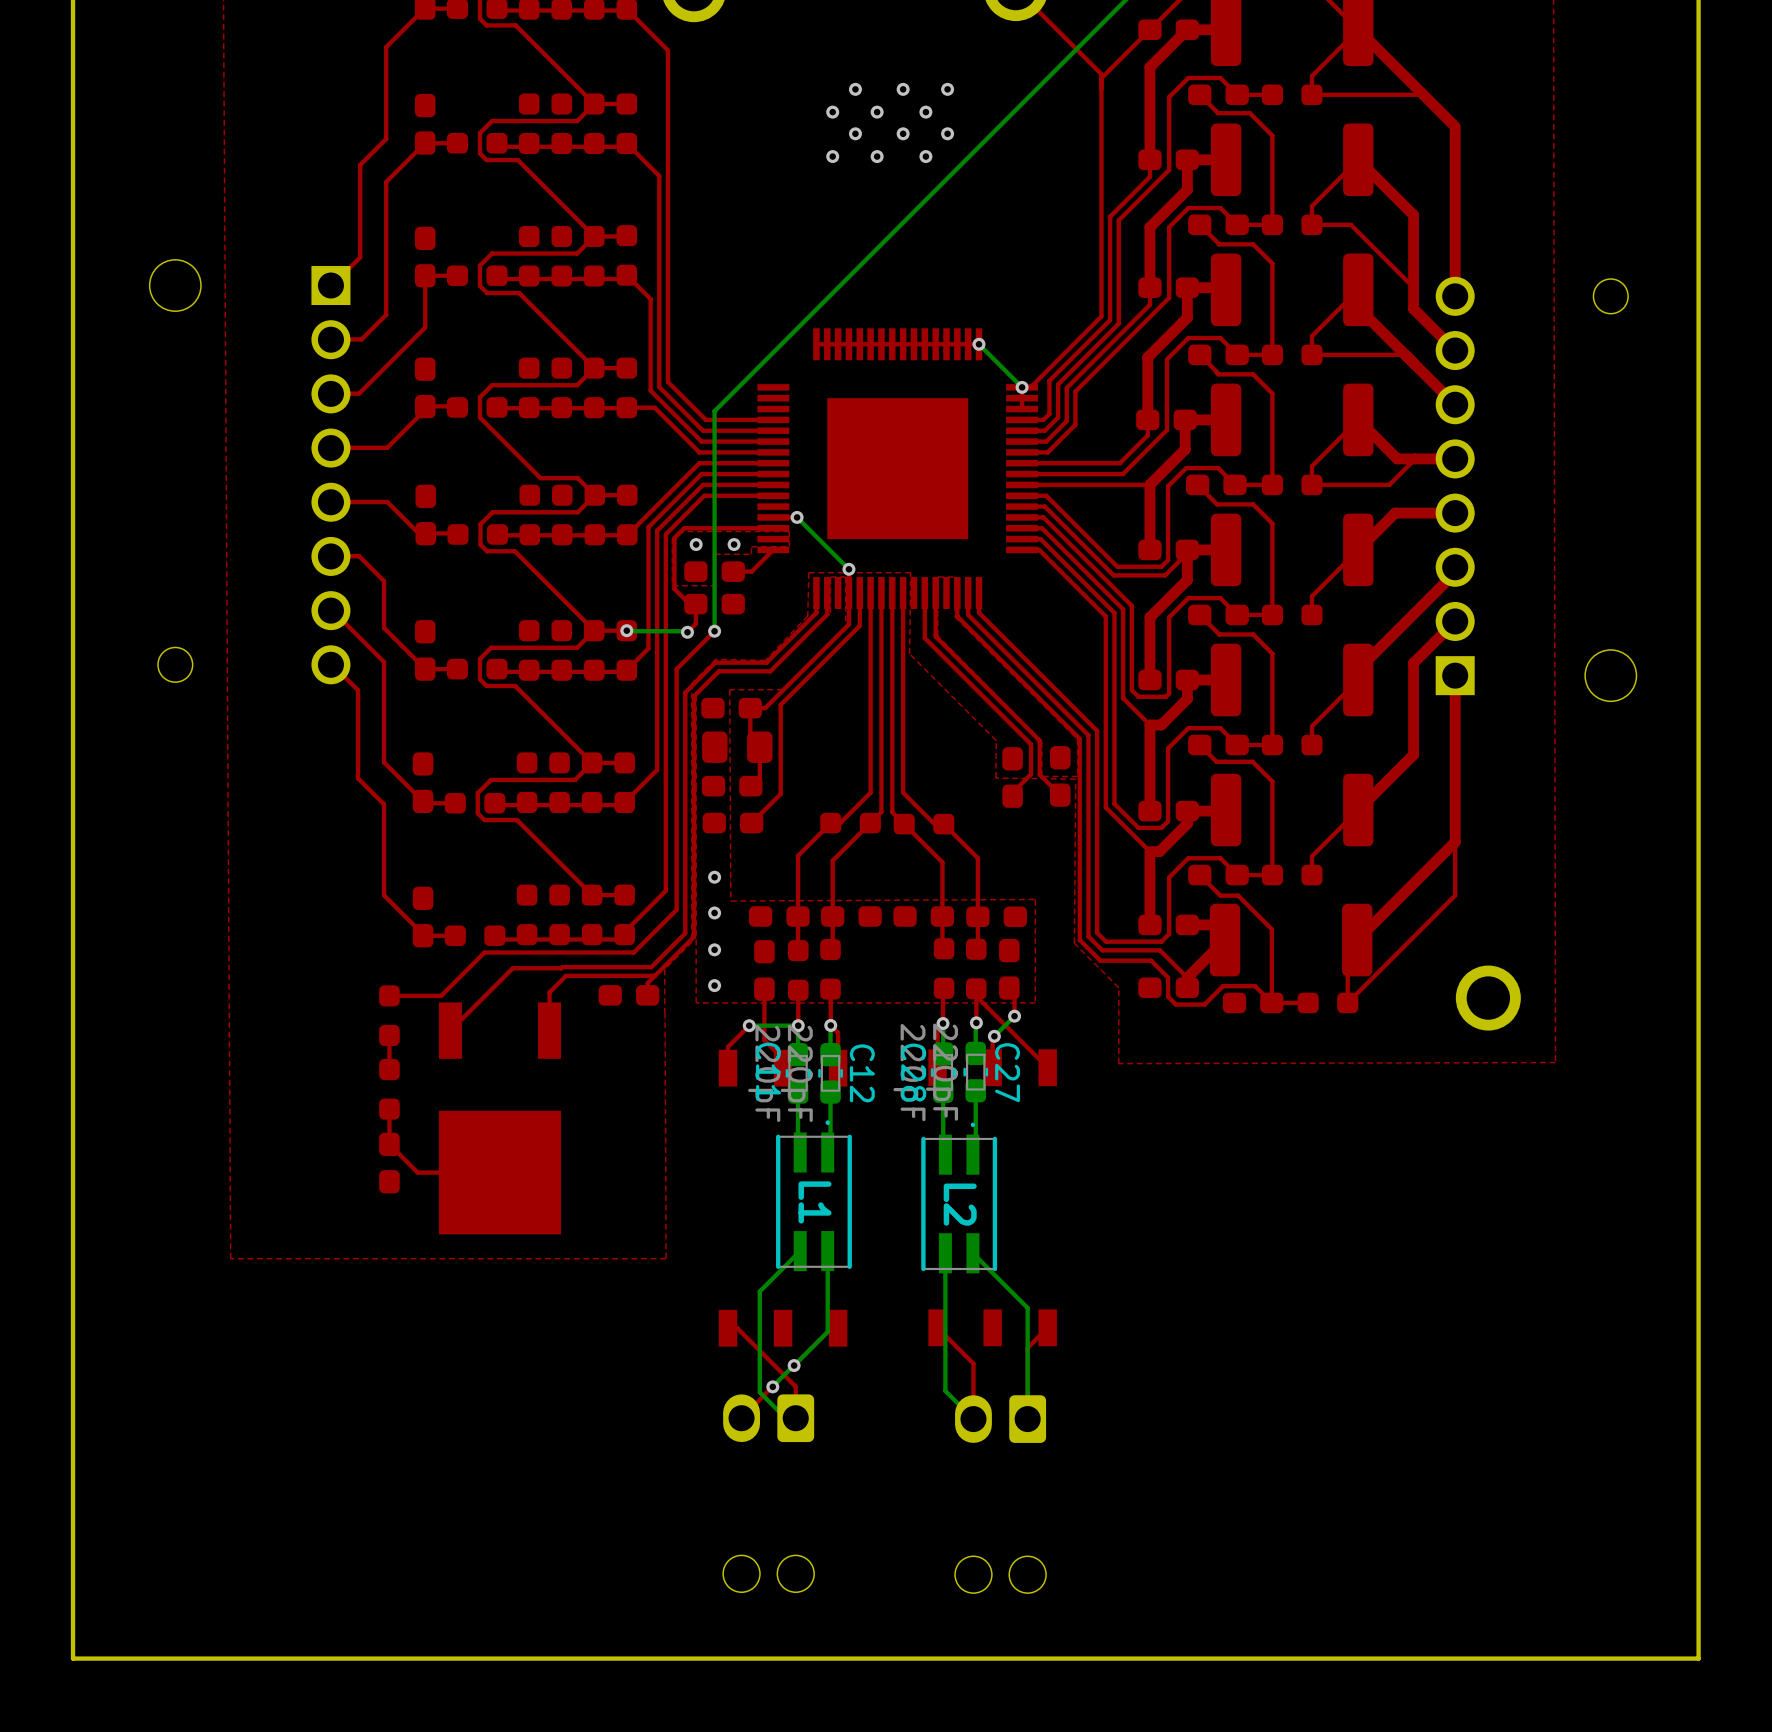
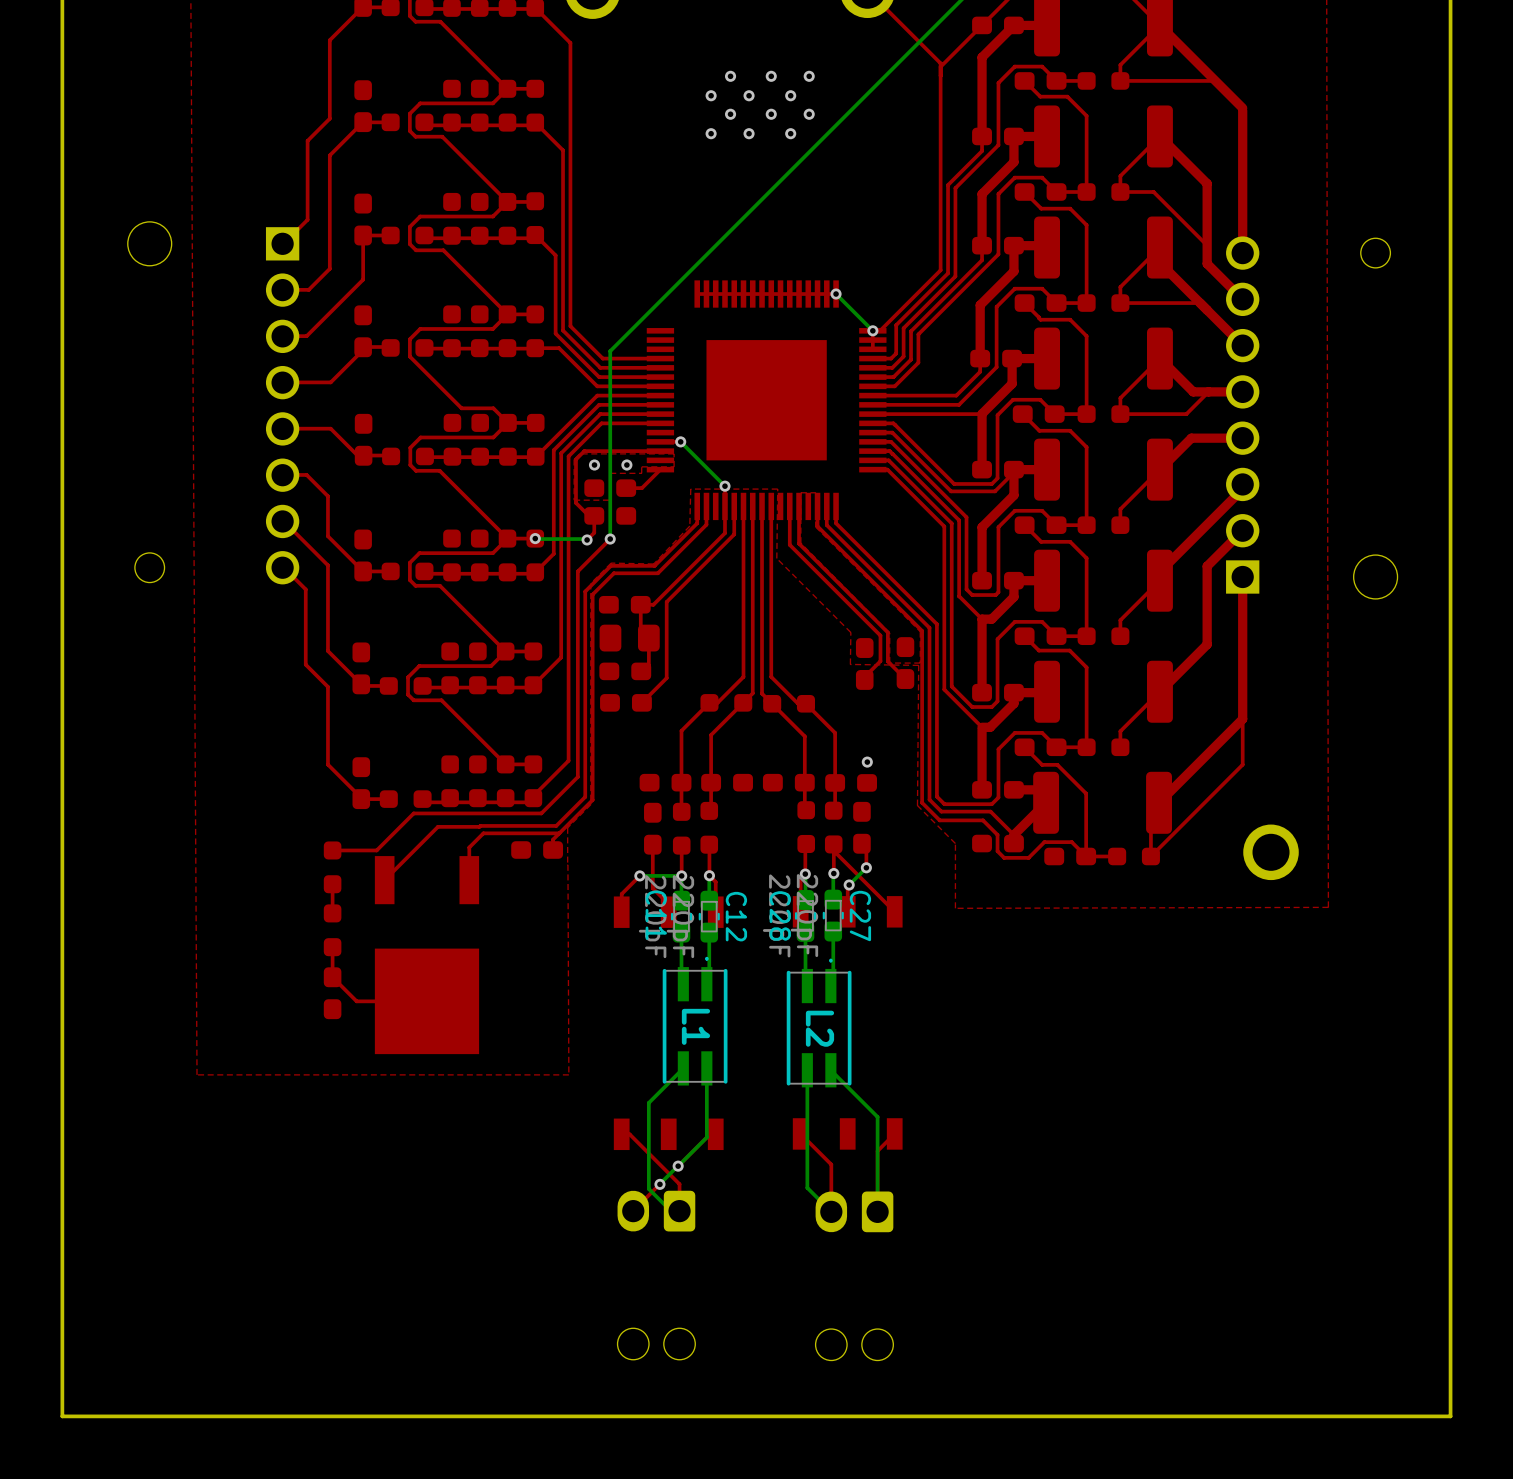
top zone outline: (845, 577) (845, 626) (782, 689) (729, 689) (730, 901) (1035, 899) (1035, 1002) (696, 1002) (696, 695) (718, 672) (770, 672) (830, 612) (830, 577) (845, 577) -> none
via: (714, 877) -> none
via: none -> (867, 762)
via: (714, 912) -> none
via: (714, 949) -> none
via: (714, 985) -> none

